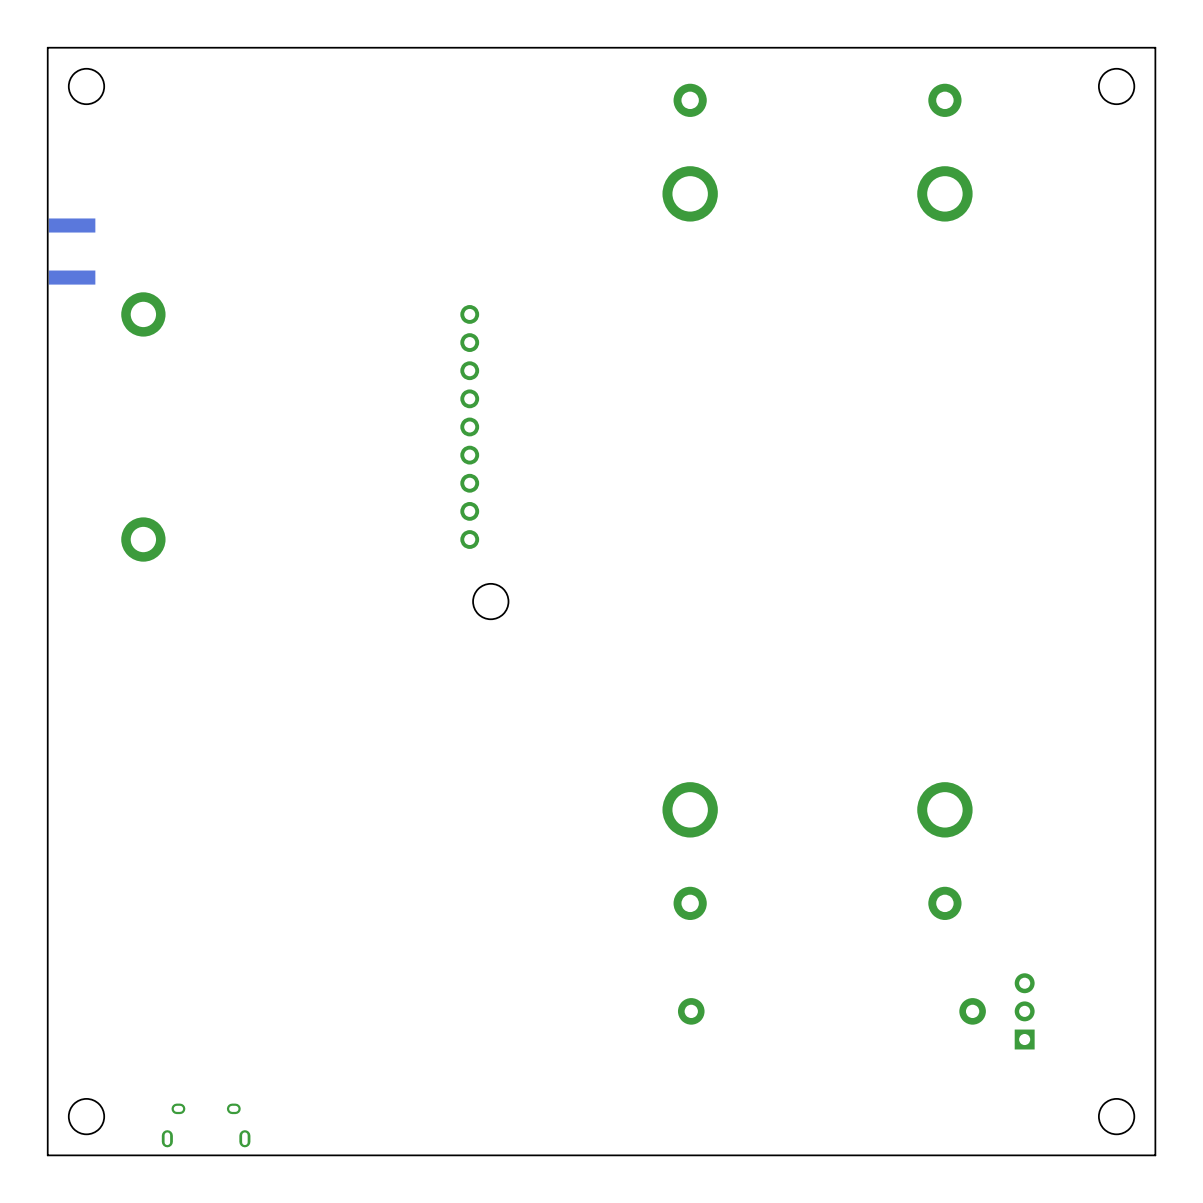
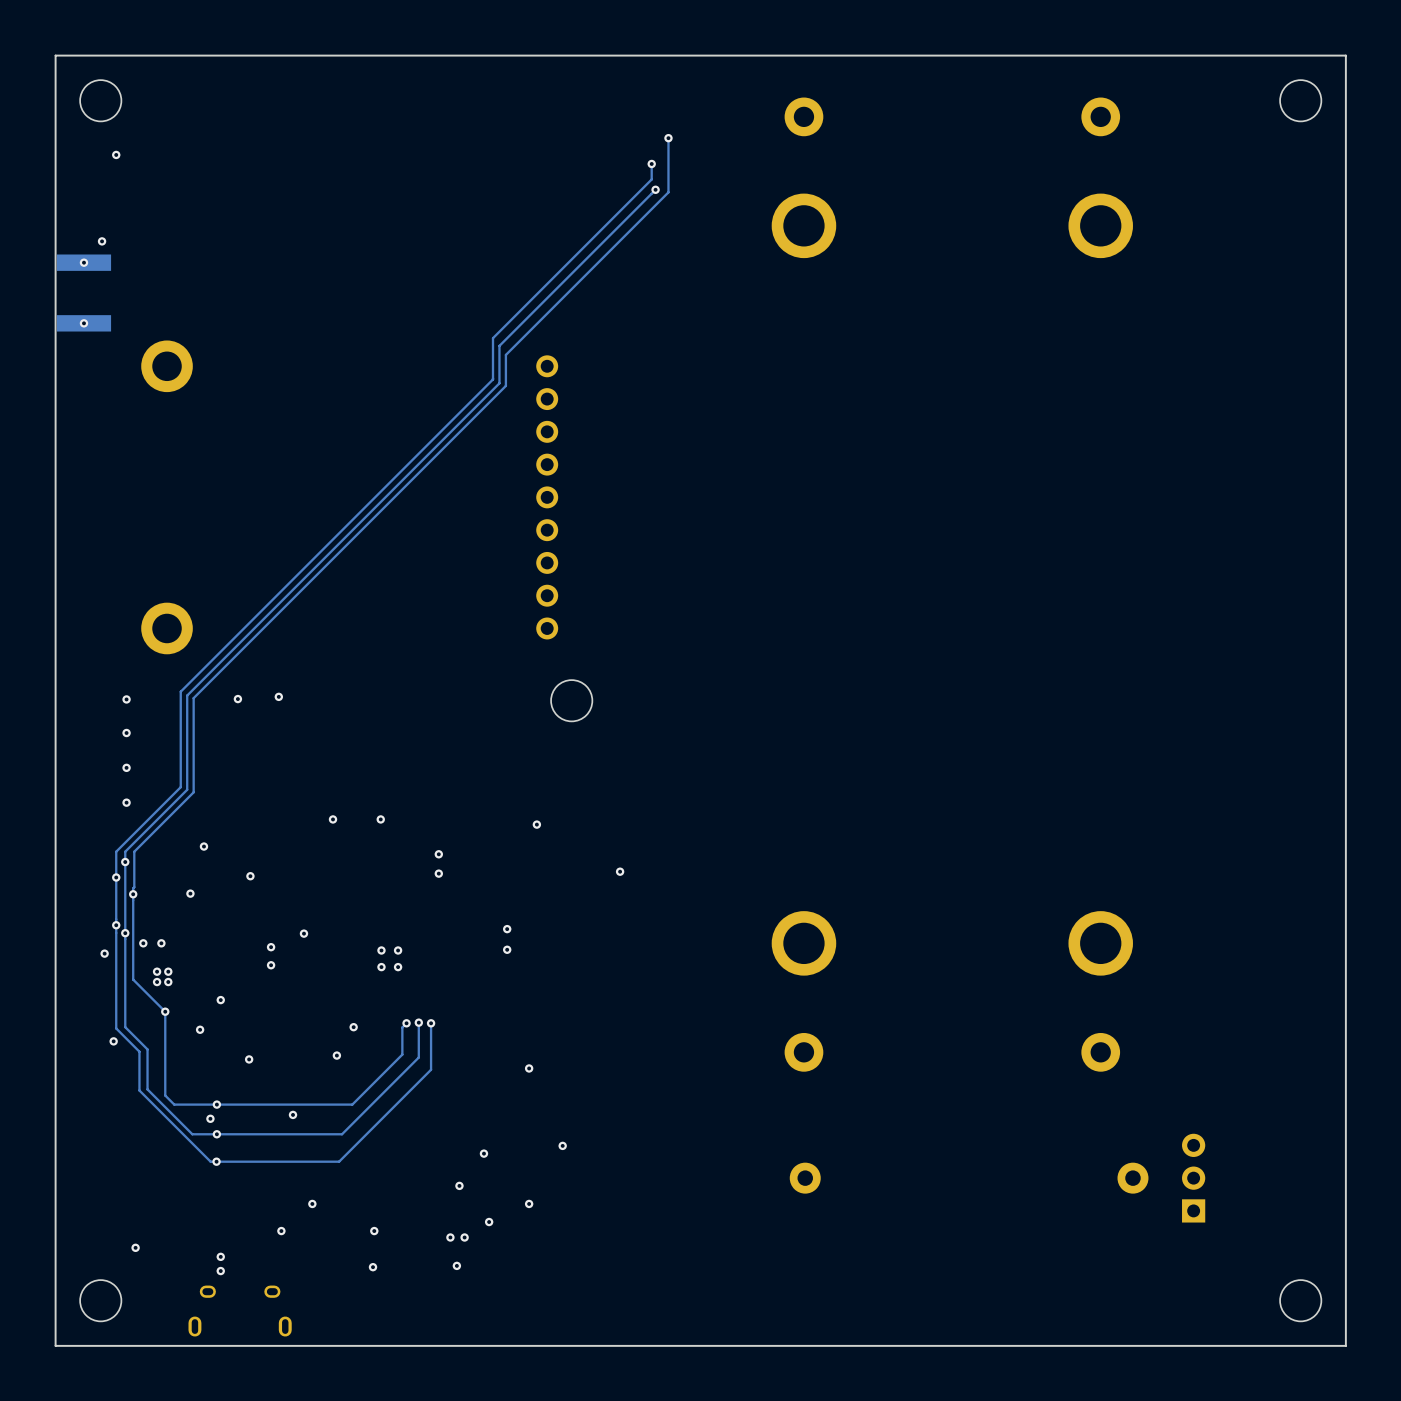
track: none -> (668, 138) (668, 192) (505, 354) (505, 385) (193, 698) (193, 792) (134, 851) (133, 979) (165, 1011) (165, 1095) (174, 1104) (352, 1104) (402, 1054) (402, 1027) (406, 1023)
via: none -> (668, 138)
via: none -> (116, 154)
track: none -> (651, 163) (651, 179) (493, 338) (493, 379) (180, 691) (180, 787) (116, 851) (116, 1028) (139, 1051) (139, 1090) (210, 1161) (339, 1161) (431, 1069) (431, 1023)
via: none -> (651, 163)
track: none -> (655, 189) (499, 345) (499, 383) (187, 695) (187, 789) (125, 851) (125, 1027) (147, 1049) (147, 1089) (192, 1134) (342, 1134) (418, 1057) (418, 1022)
via: none -> (655, 189)
via: none -> (102, 241)
via: none -> (83, 262)
via: none -> (83, 323)
via: none -> (278, 696)
via: none -> (126, 699)
via: none -> (237, 699)
via: none -> (126, 732)
via: none -> (126, 767)
via: none -> (126, 802)
via: none -> (333, 819)
via: none -> (380, 819)
via: none -> (536, 824)
via: none -> (203, 846)
via: none -> (438, 854)
via: none -> (125, 862)
via: none -> (620, 871)
via: none -> (438, 873)
via: none -> (250, 876)
via: none -> (116, 877)
via: none -> (133, 894)
via: none -> (190, 893)
via: none -> (116, 925)
via: none -> (507, 929)
via: none -> (125, 933)
via: none -> (303, 933)
via: none -> (143, 943)
via: none -> (161, 943)
via: none -> (271, 947)
via: none -> (381, 950)
via: none -> (398, 950)
via: none -> (507, 949)
via: none -> (104, 953)
via: none -> (271, 965)
via: none -> (381, 967)
via: none -> (398, 967)
via: none -> (157, 971)
via: none -> (168, 971)
via: none -> (157, 982)
via: none -> (168, 982)
via: none -> (220, 1000)
via: none -> (165, 1011)
via: none -> (418, 1022)
via: none -> (406, 1023)
via: none -> (431, 1023)
via: none -> (353, 1027)
via: none -> (200, 1029)
via: none -> (113, 1041)
via: none -> (336, 1055)
via: none -> (249, 1059)
via: none -> (529, 1068)
via: none -> (216, 1104)
via: none -> (293, 1114)
via: none -> (210, 1118)
via: none -> (216, 1134)
via: none -> (562, 1145)
via: none -> (483, 1153)
via: none -> (216, 1161)
via: none -> (459, 1185)
via: none -> (312, 1203)
via: none -> (529, 1203)
via: none -> (489, 1222)
via: none -> (281, 1231)
via: none -> (374, 1231)
via: none -> (450, 1237)
via: none -> (464, 1237)
via: none -> (135, 1247)
via: none -> (220, 1256)
via: none -> (456, 1265)
via: none -> (373, 1267)
via: none -> (220, 1271)

